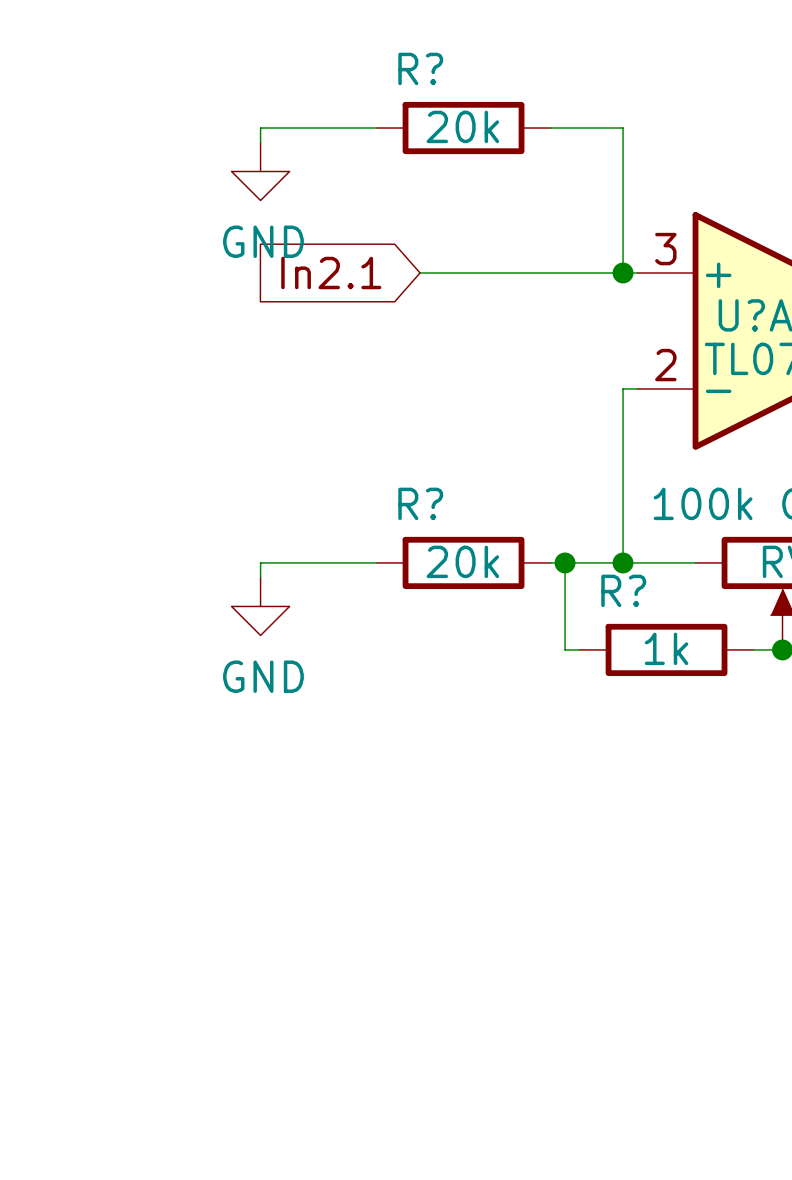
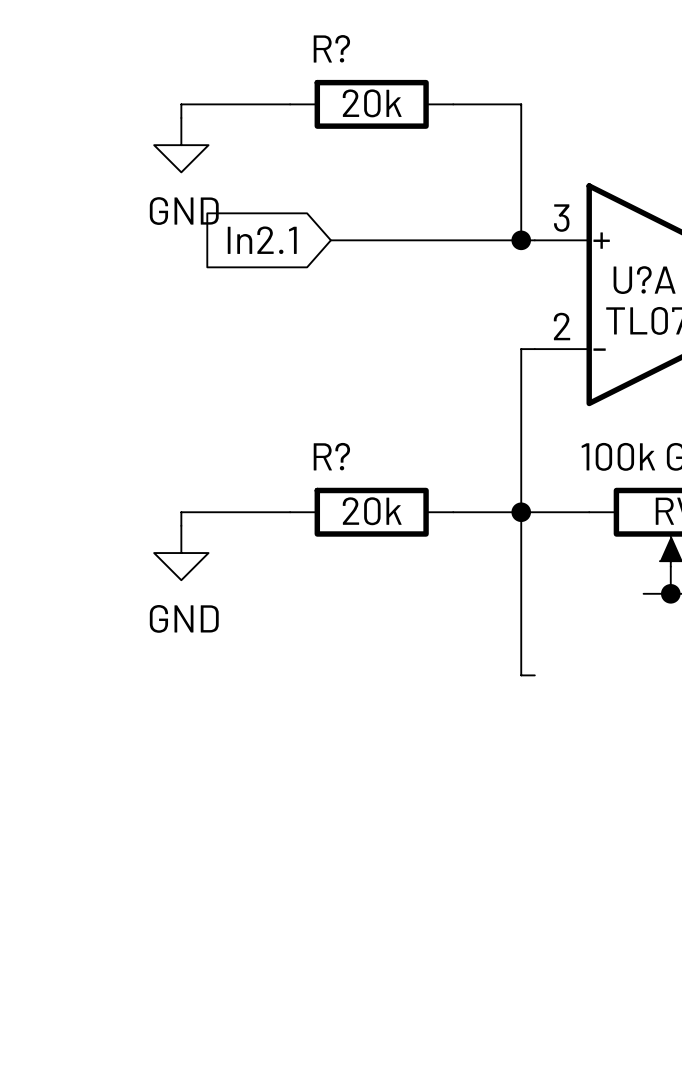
wire: (565, 562) (565, 649) (579, 649) -> none
junction: (565, 562) -> none
wire: none -> (521, 512) (521, 675) (534, 675)
R?: 1k (666, 649) -> none

